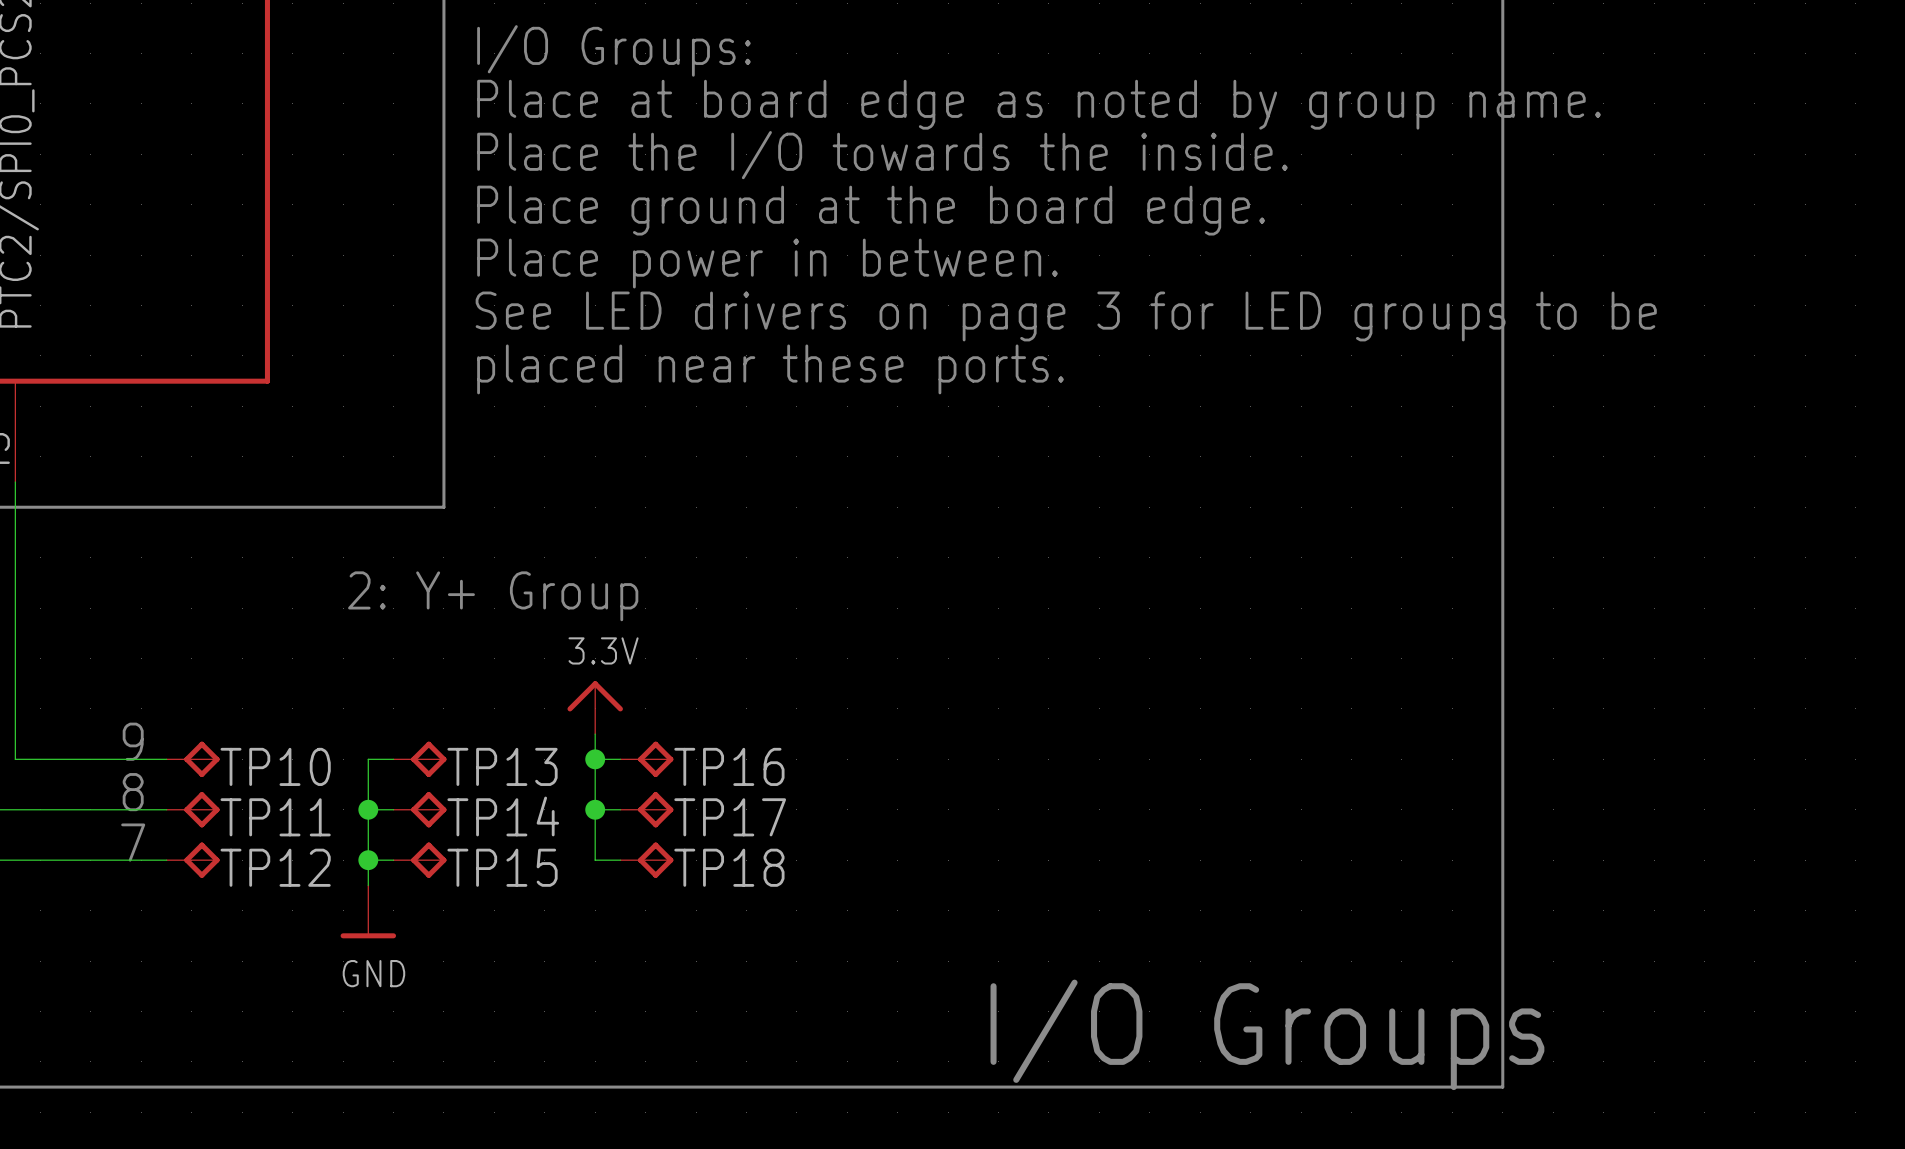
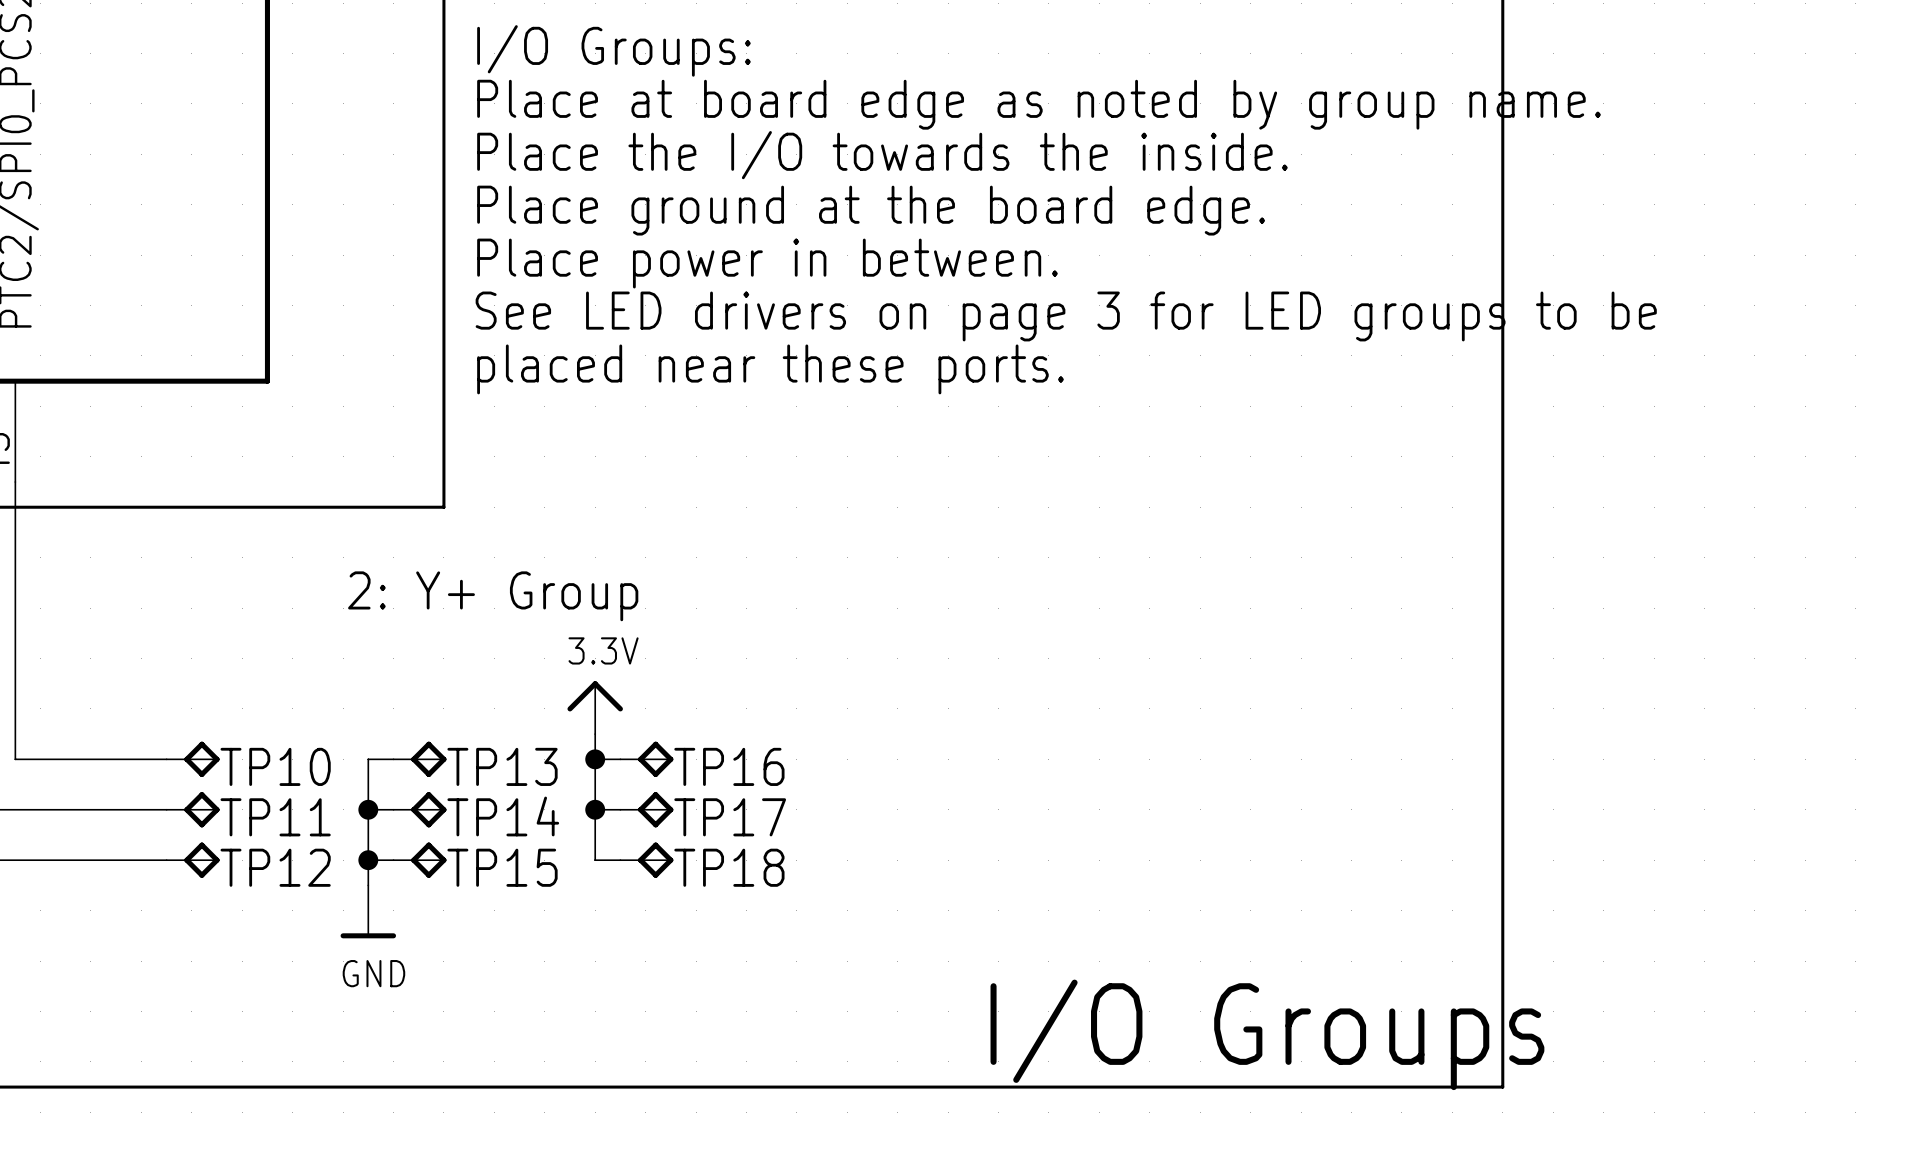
text: 9 (133, 741) -> none
text: 8 (133, 792) -> none
text: 7 (133, 842) -> none

